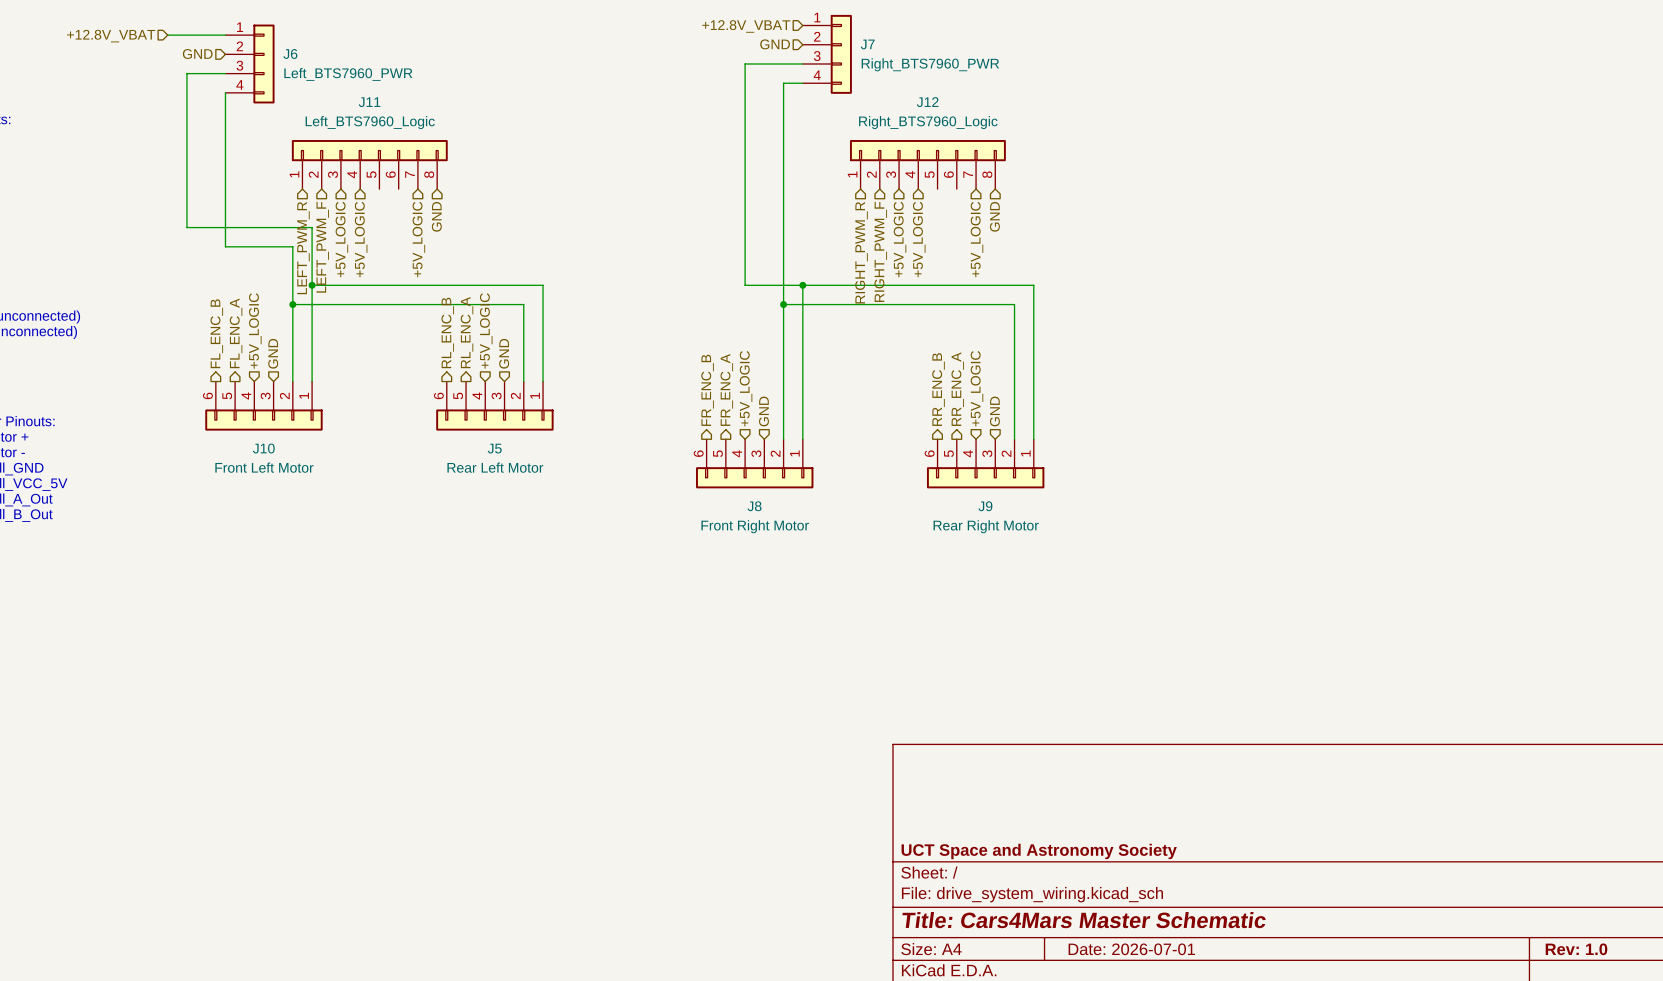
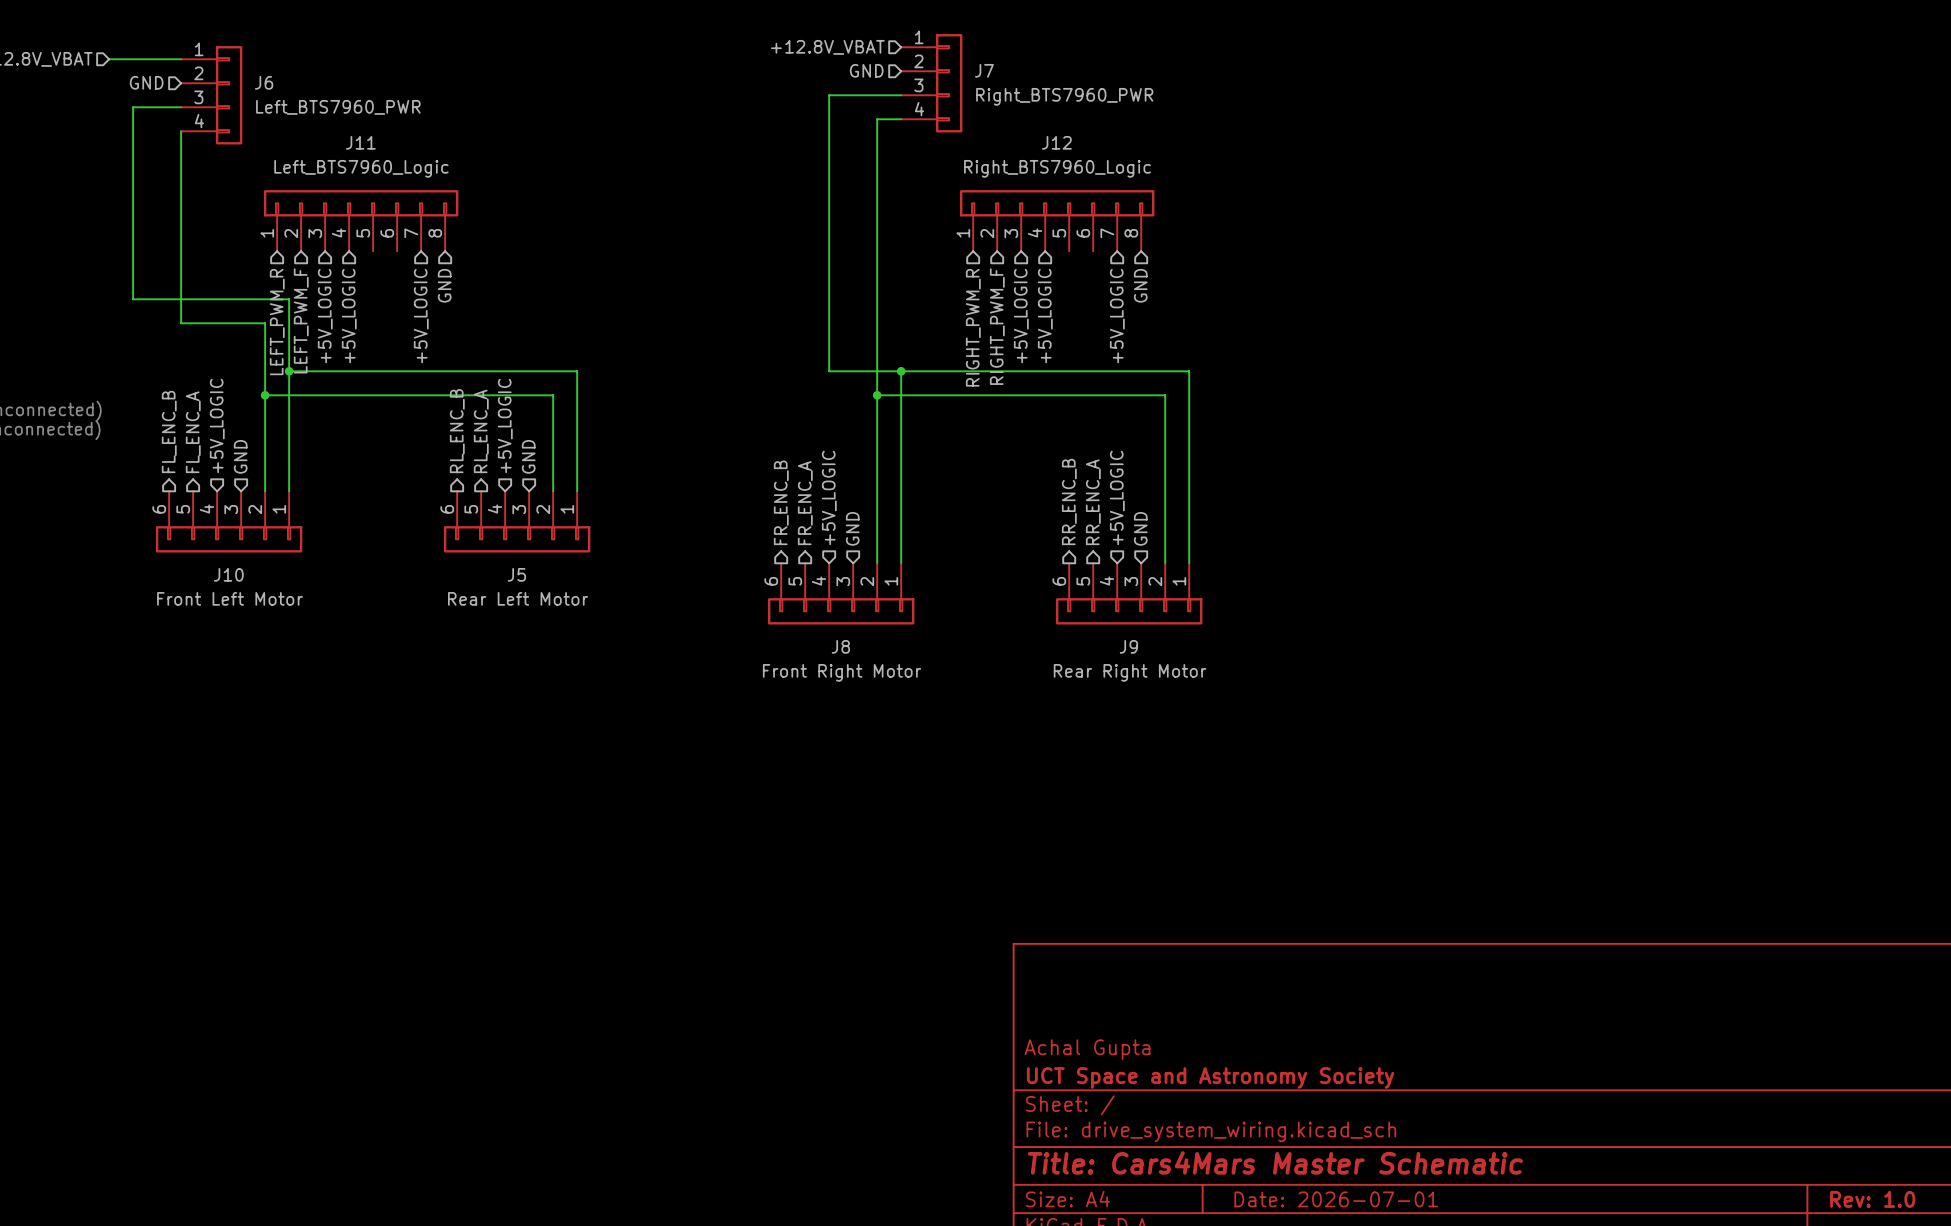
title block: none -> Achal Gupta (1087, 1049)

